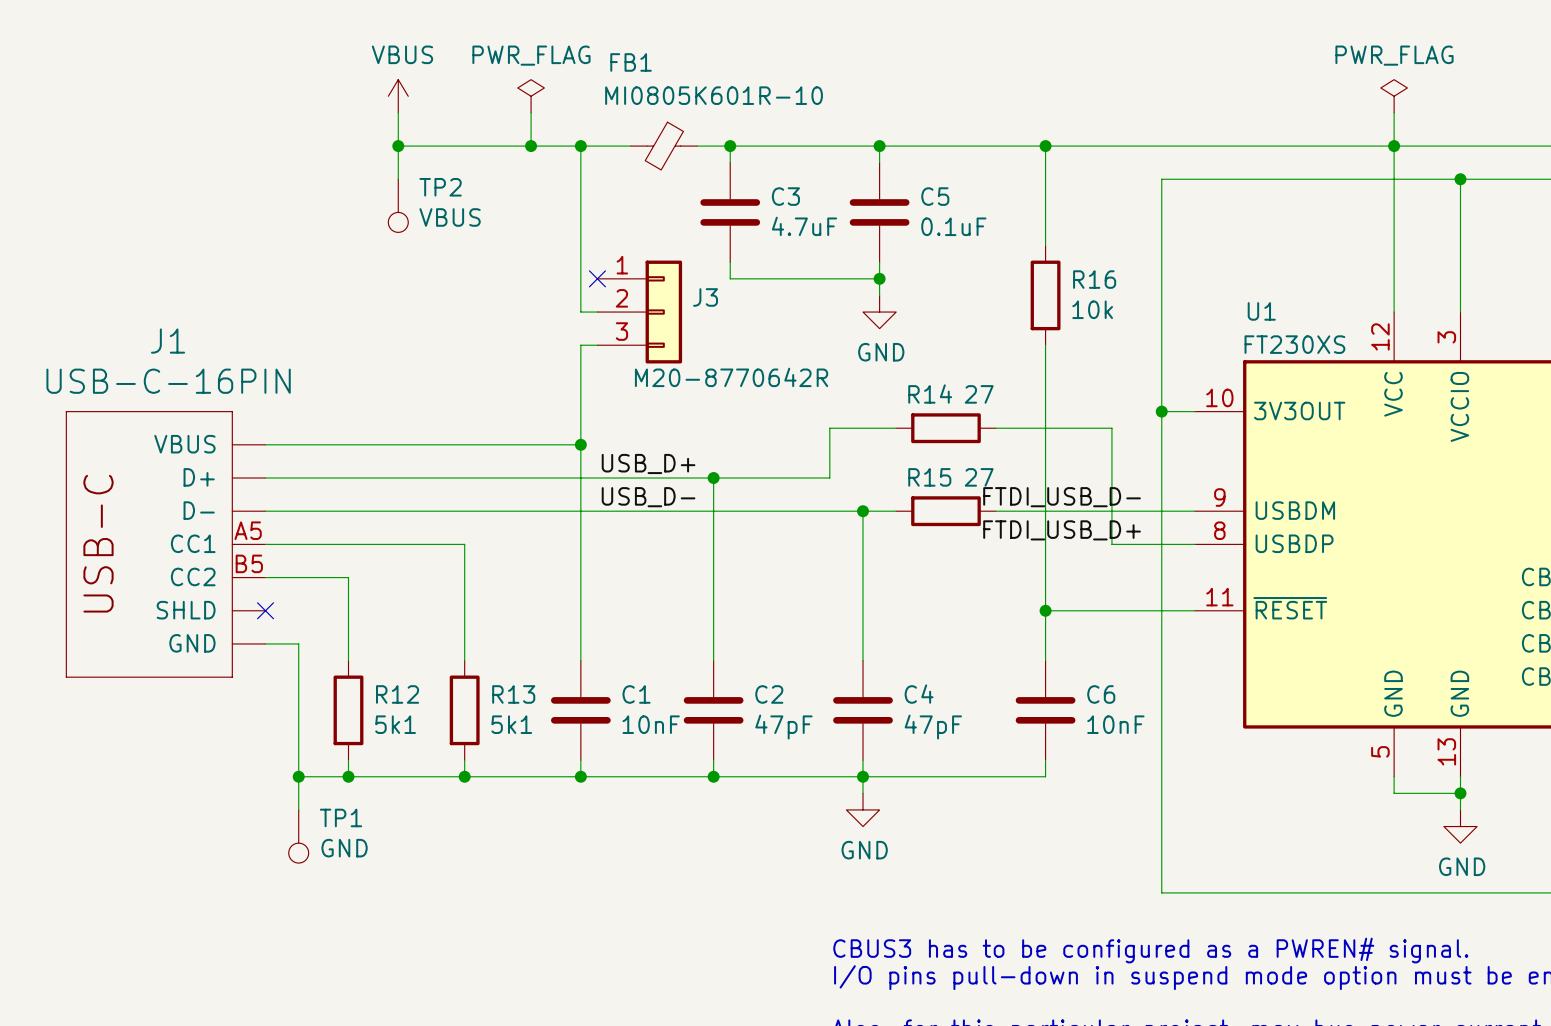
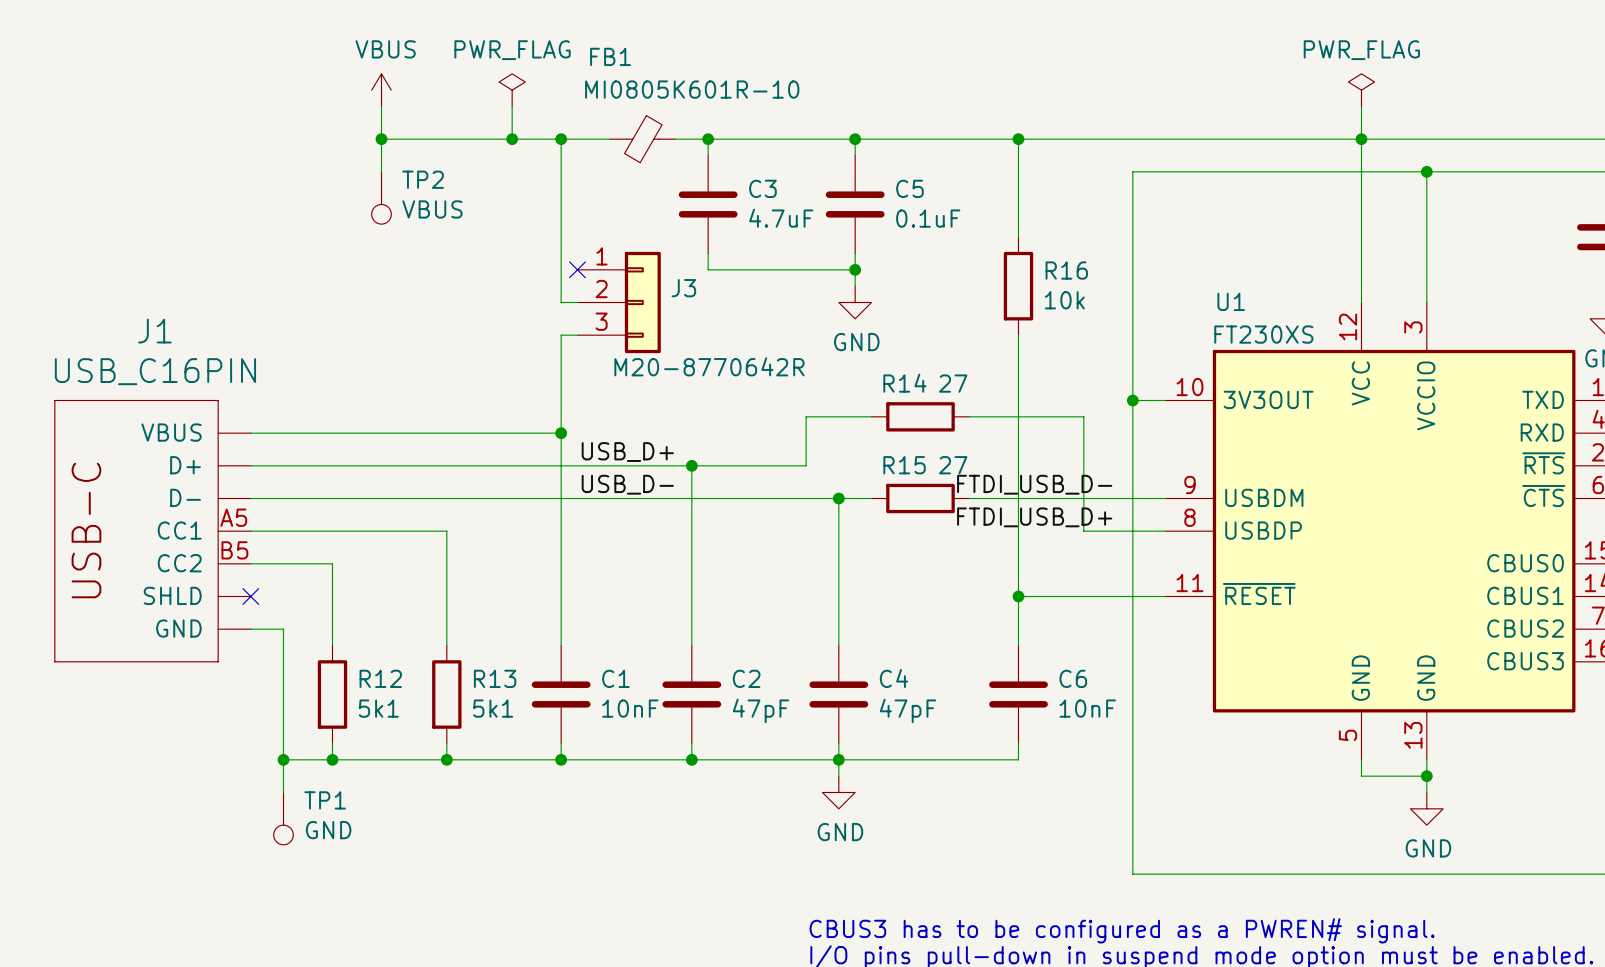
J1 value: USB-C-16PIN (168, 381) -> USB_C16PIN (155, 371)

